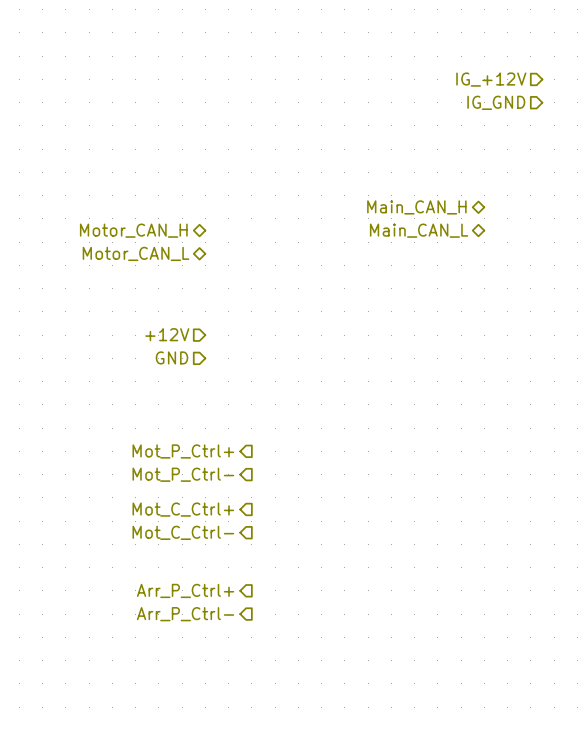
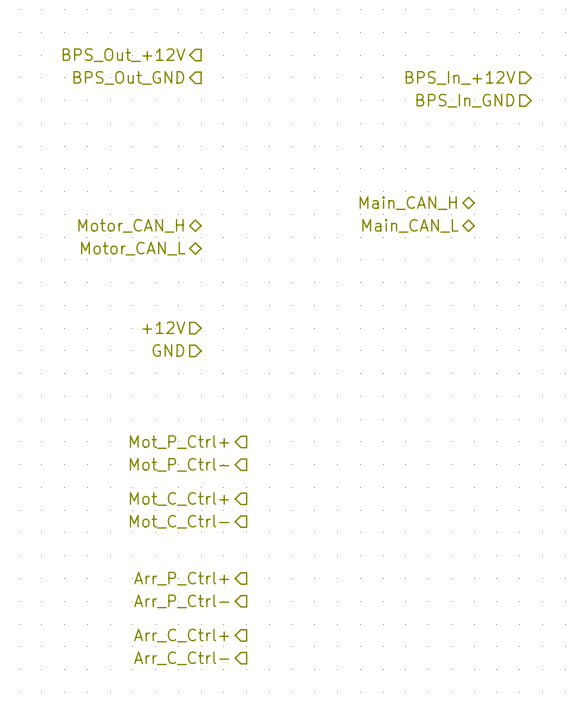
hierarchical label: none -> BPS_Out_+12V (123, 55)
hierarchical label: none -> BPS_Out_GND (128, 77)
hierarchical label: IG_+12V (491, 79) -> BPS_In_+12V (460, 77)
hierarchical label: IG_GND (496, 102) -> BPS_In_GND (465, 100)
hierarchical label: none -> Arr_C_Ctrl+ (181, 635)
hierarchical label: none -> Arr_C_Ctrl- (181, 658)

